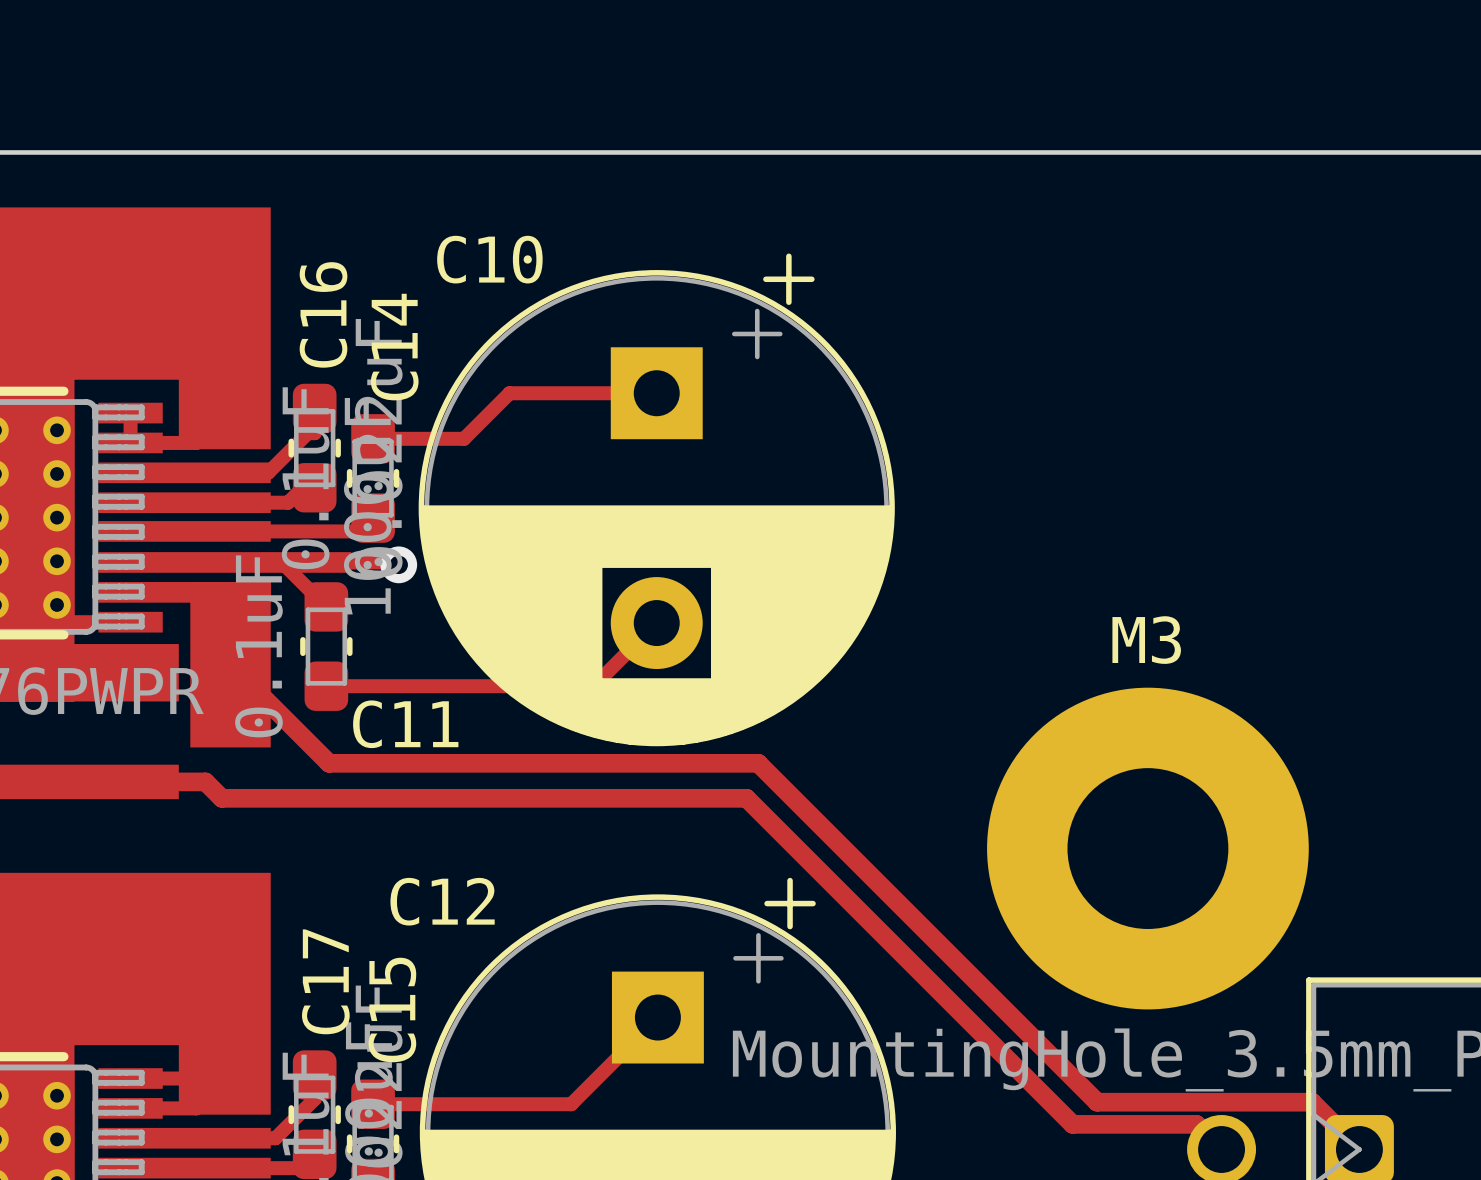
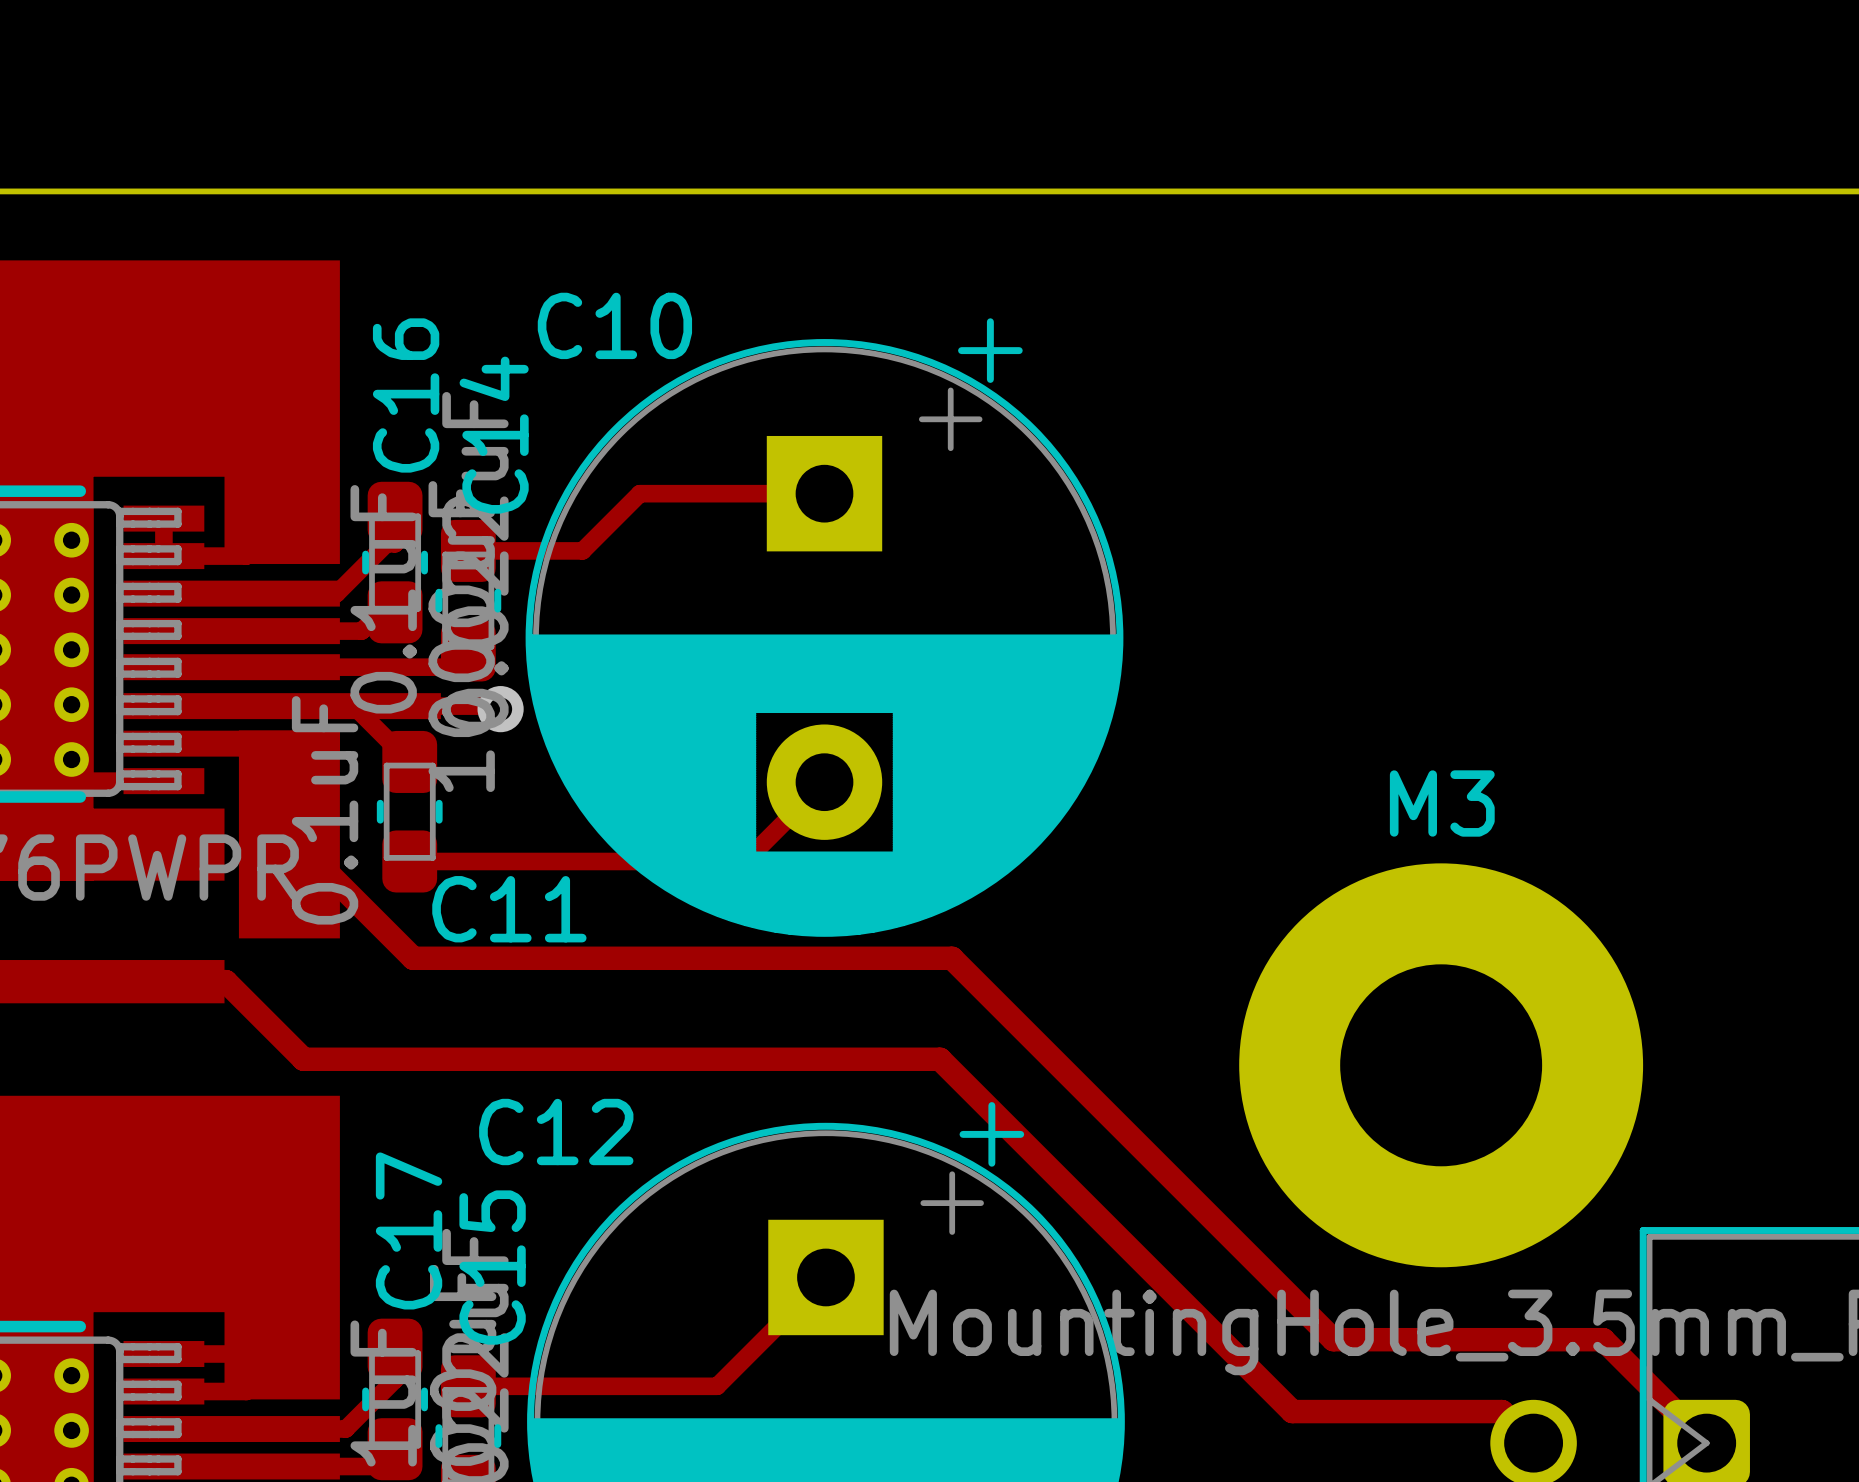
top track: (179, 781) (205, 781) (221, 798) (746, 798) (1072, 1124) -> (225, 981) (303, 1059) (940, 1059) (1292, 1411) (1346, 1411)
top track: (1062, 1067) (1097, 1102) (1312, 1102) -> (1333, 1339) (1603, 1339) (1647, 1383)

